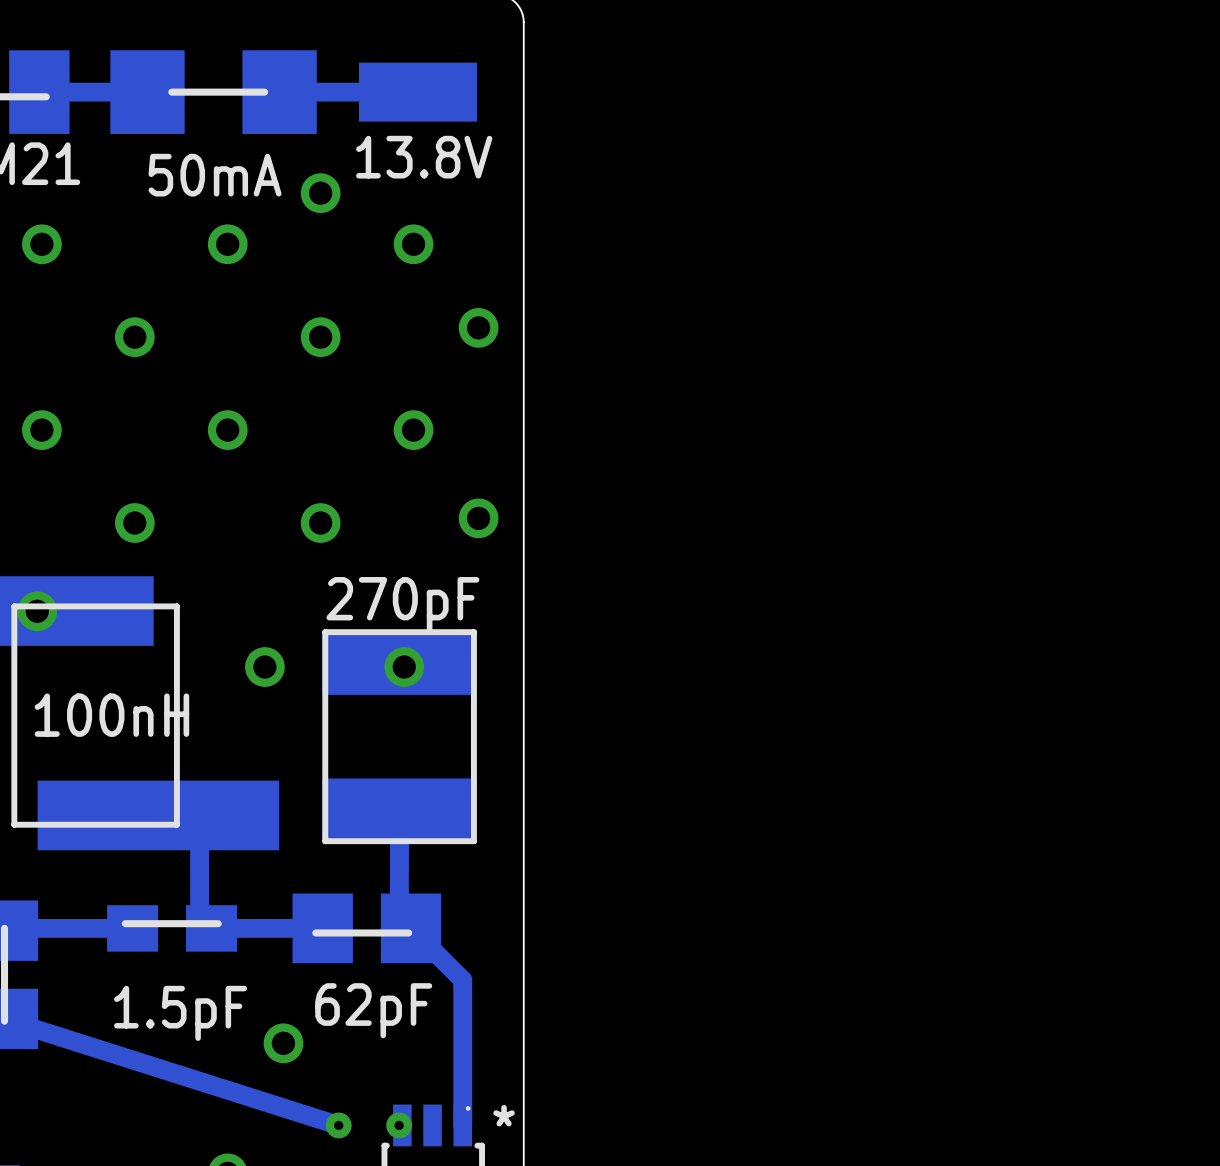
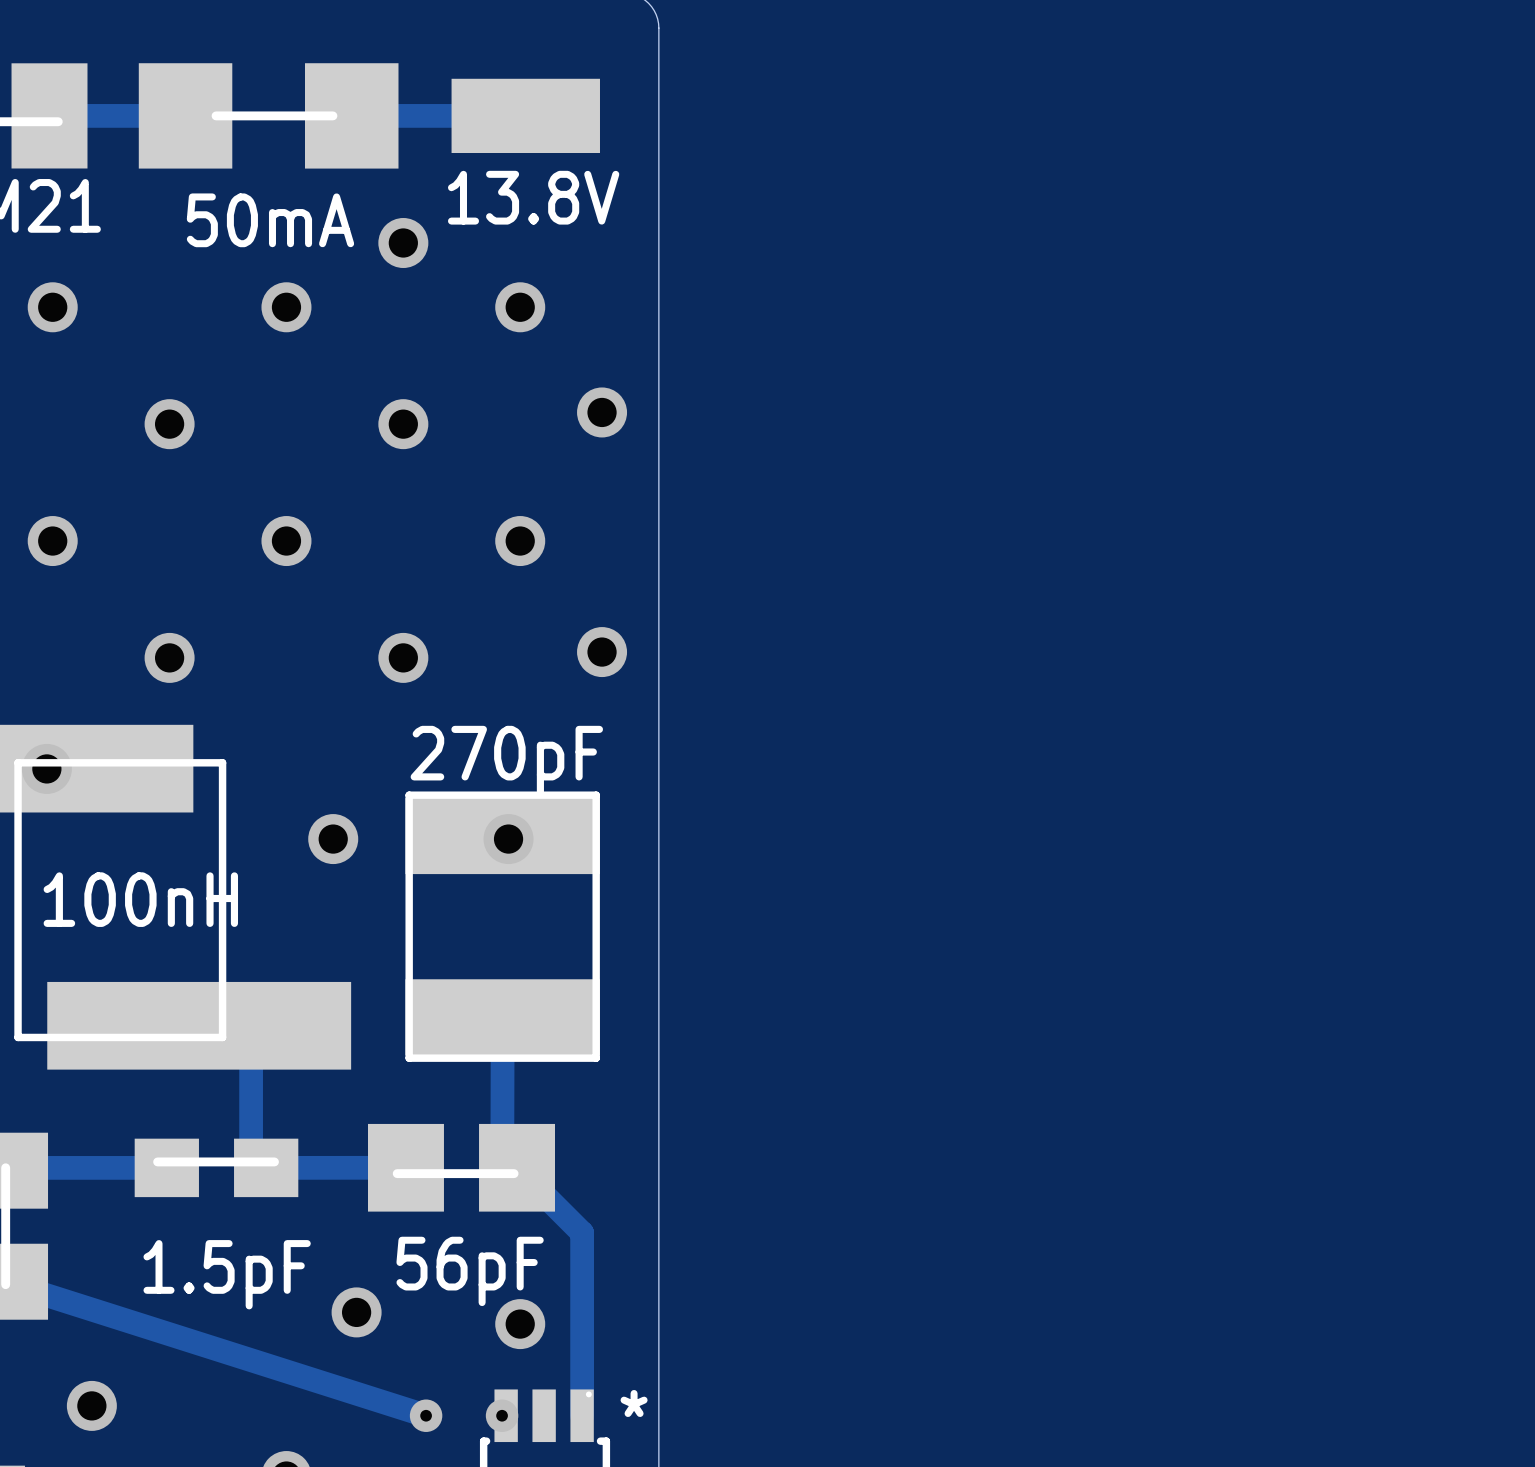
part value: 62pF (373, 1010) -> 56pF (470, 1271)
via: none -> (520, 1324)
via: none -> (91, 1405)

